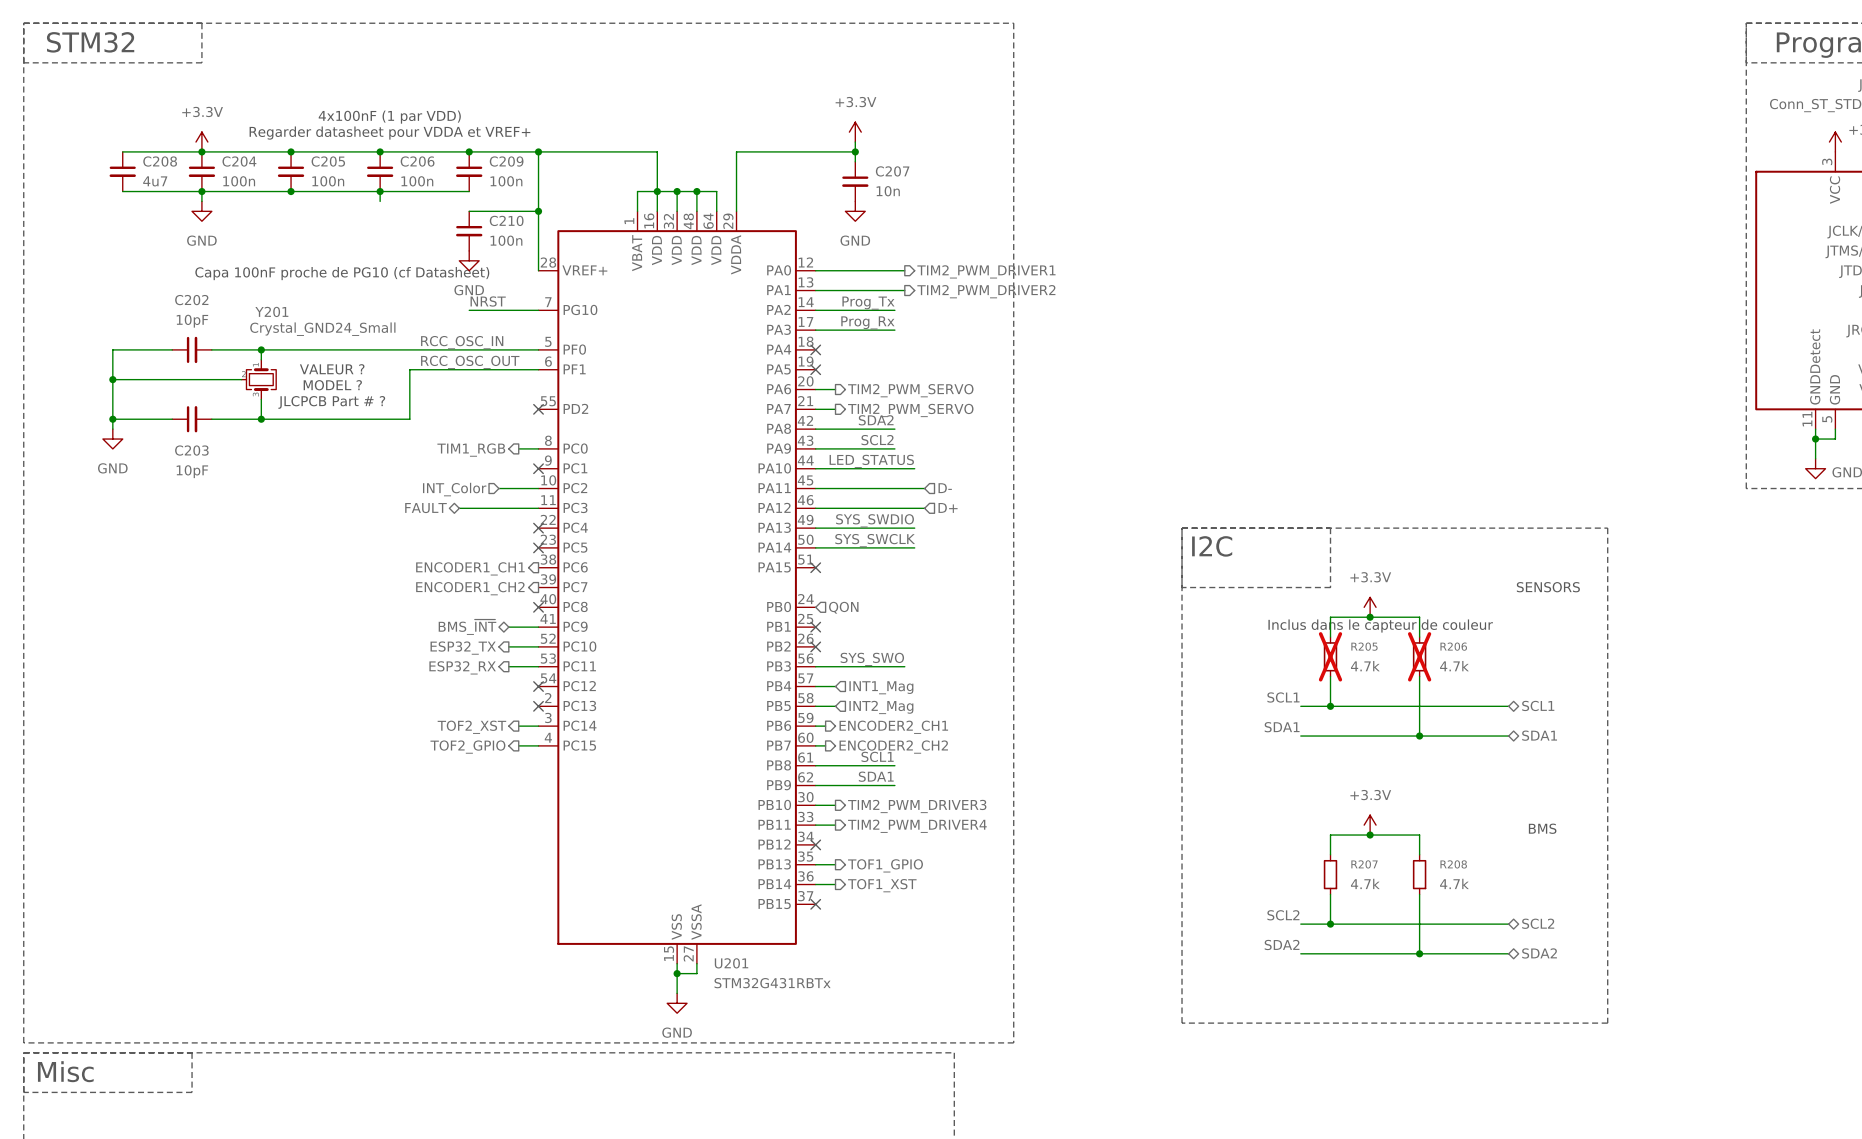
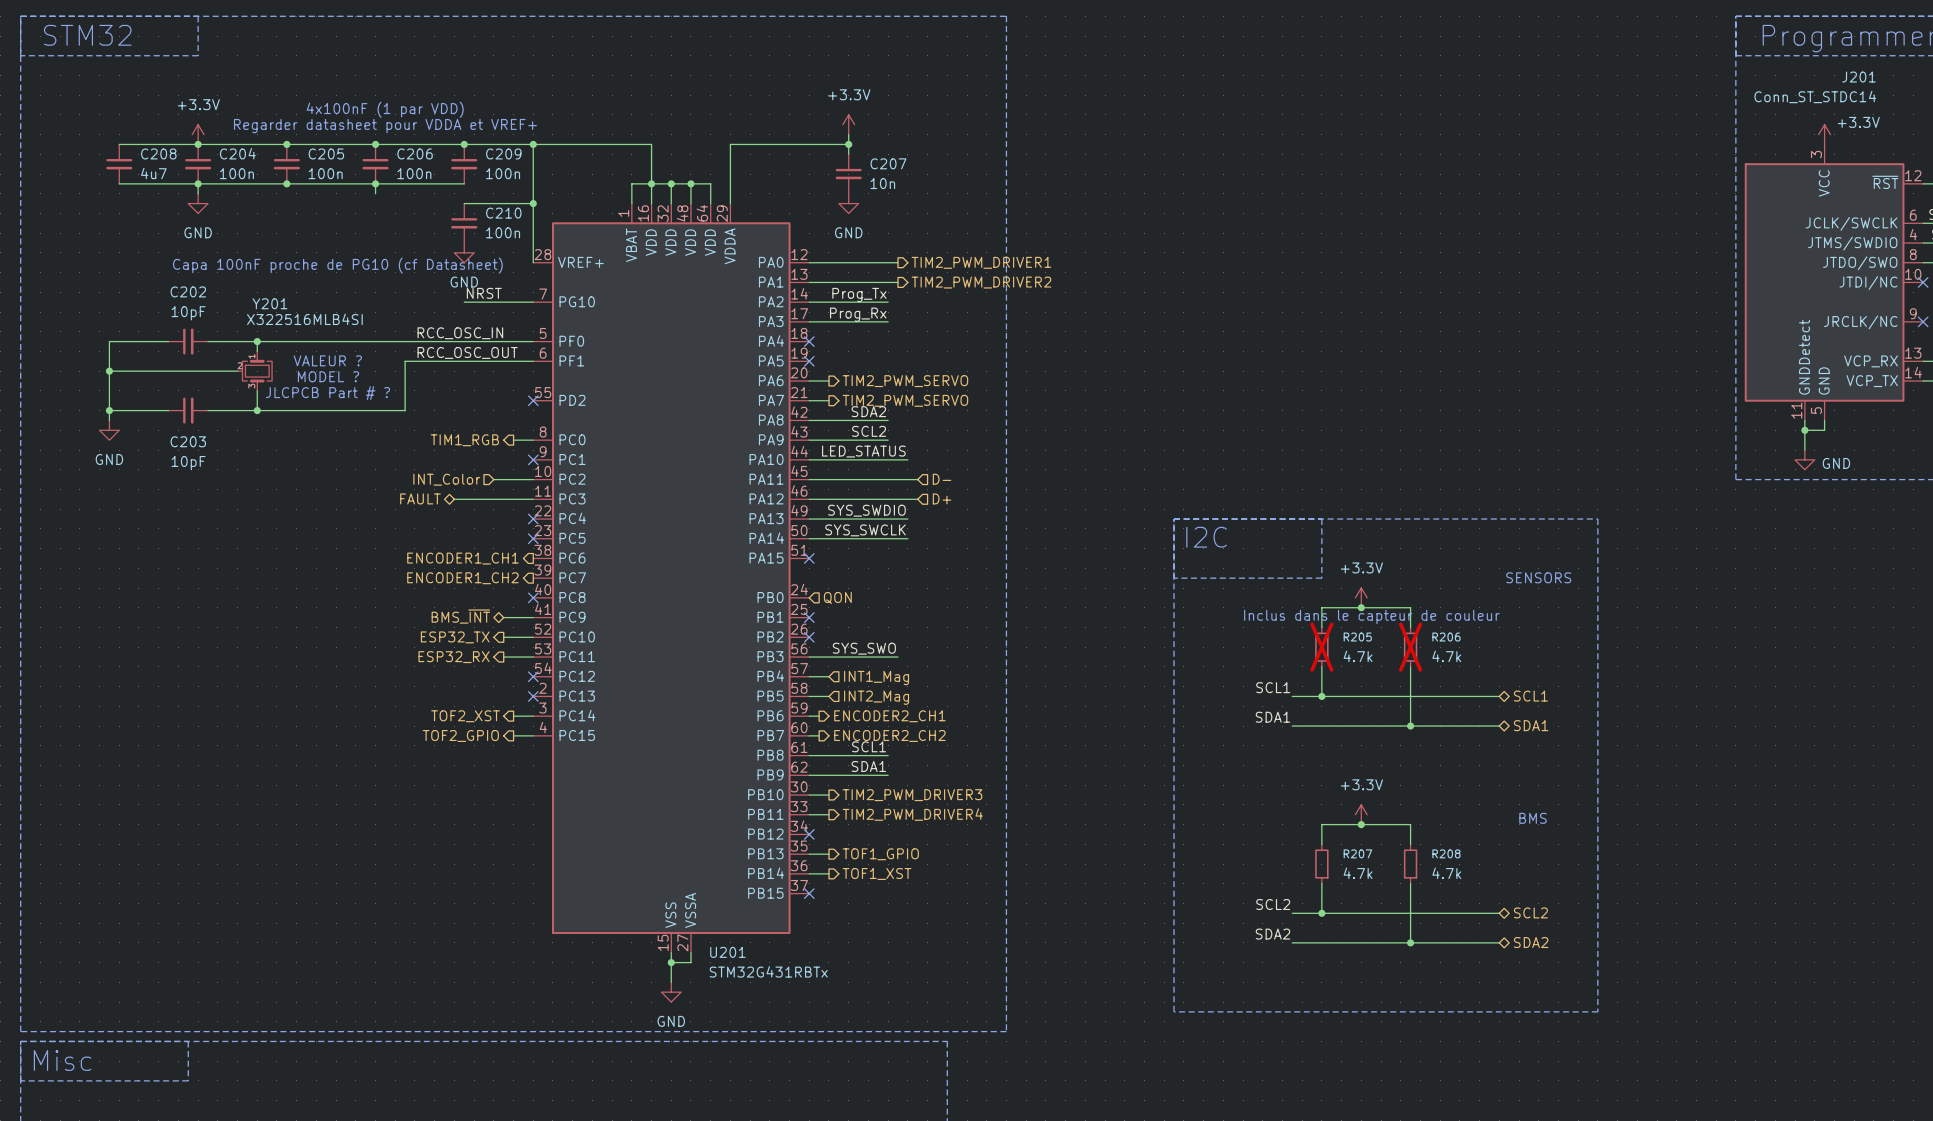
Y201 value: Crystal_GND24_Small (322, 329) -> X322516MLB4SI (304, 319)

